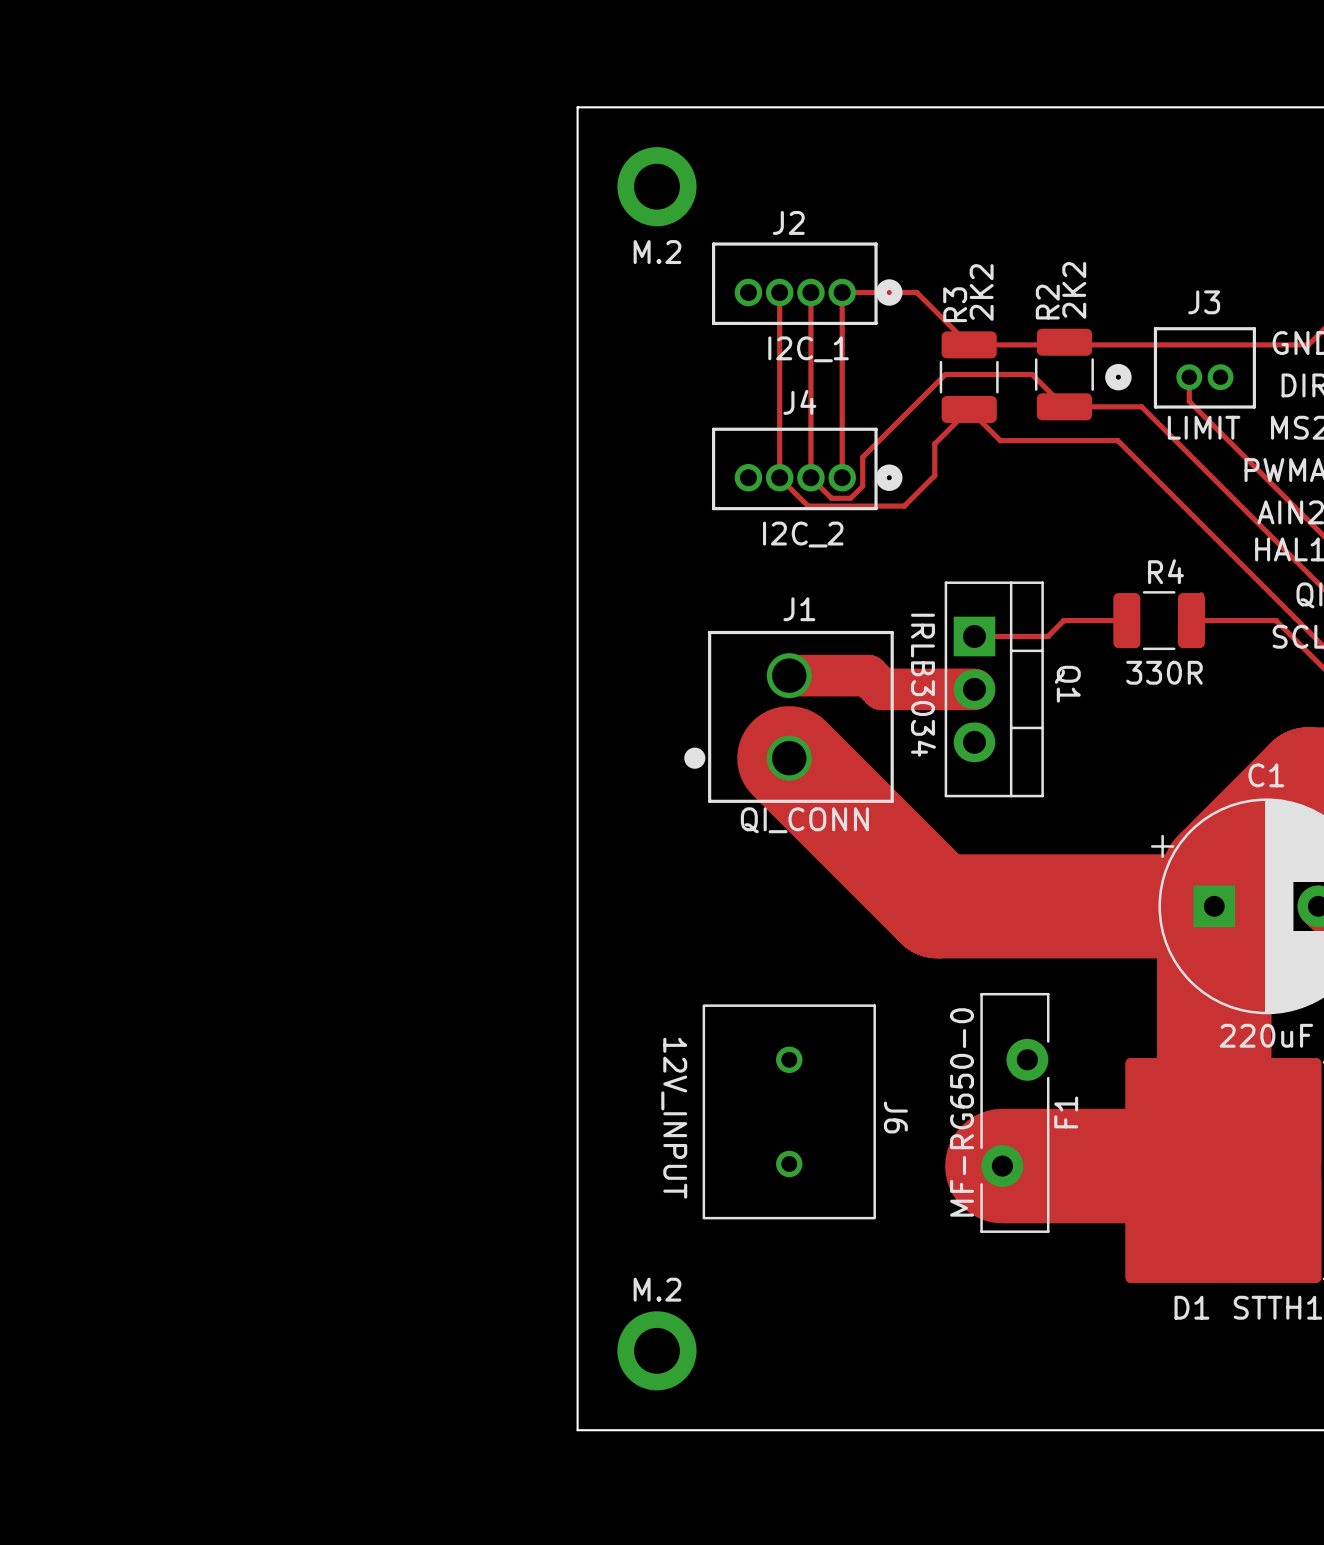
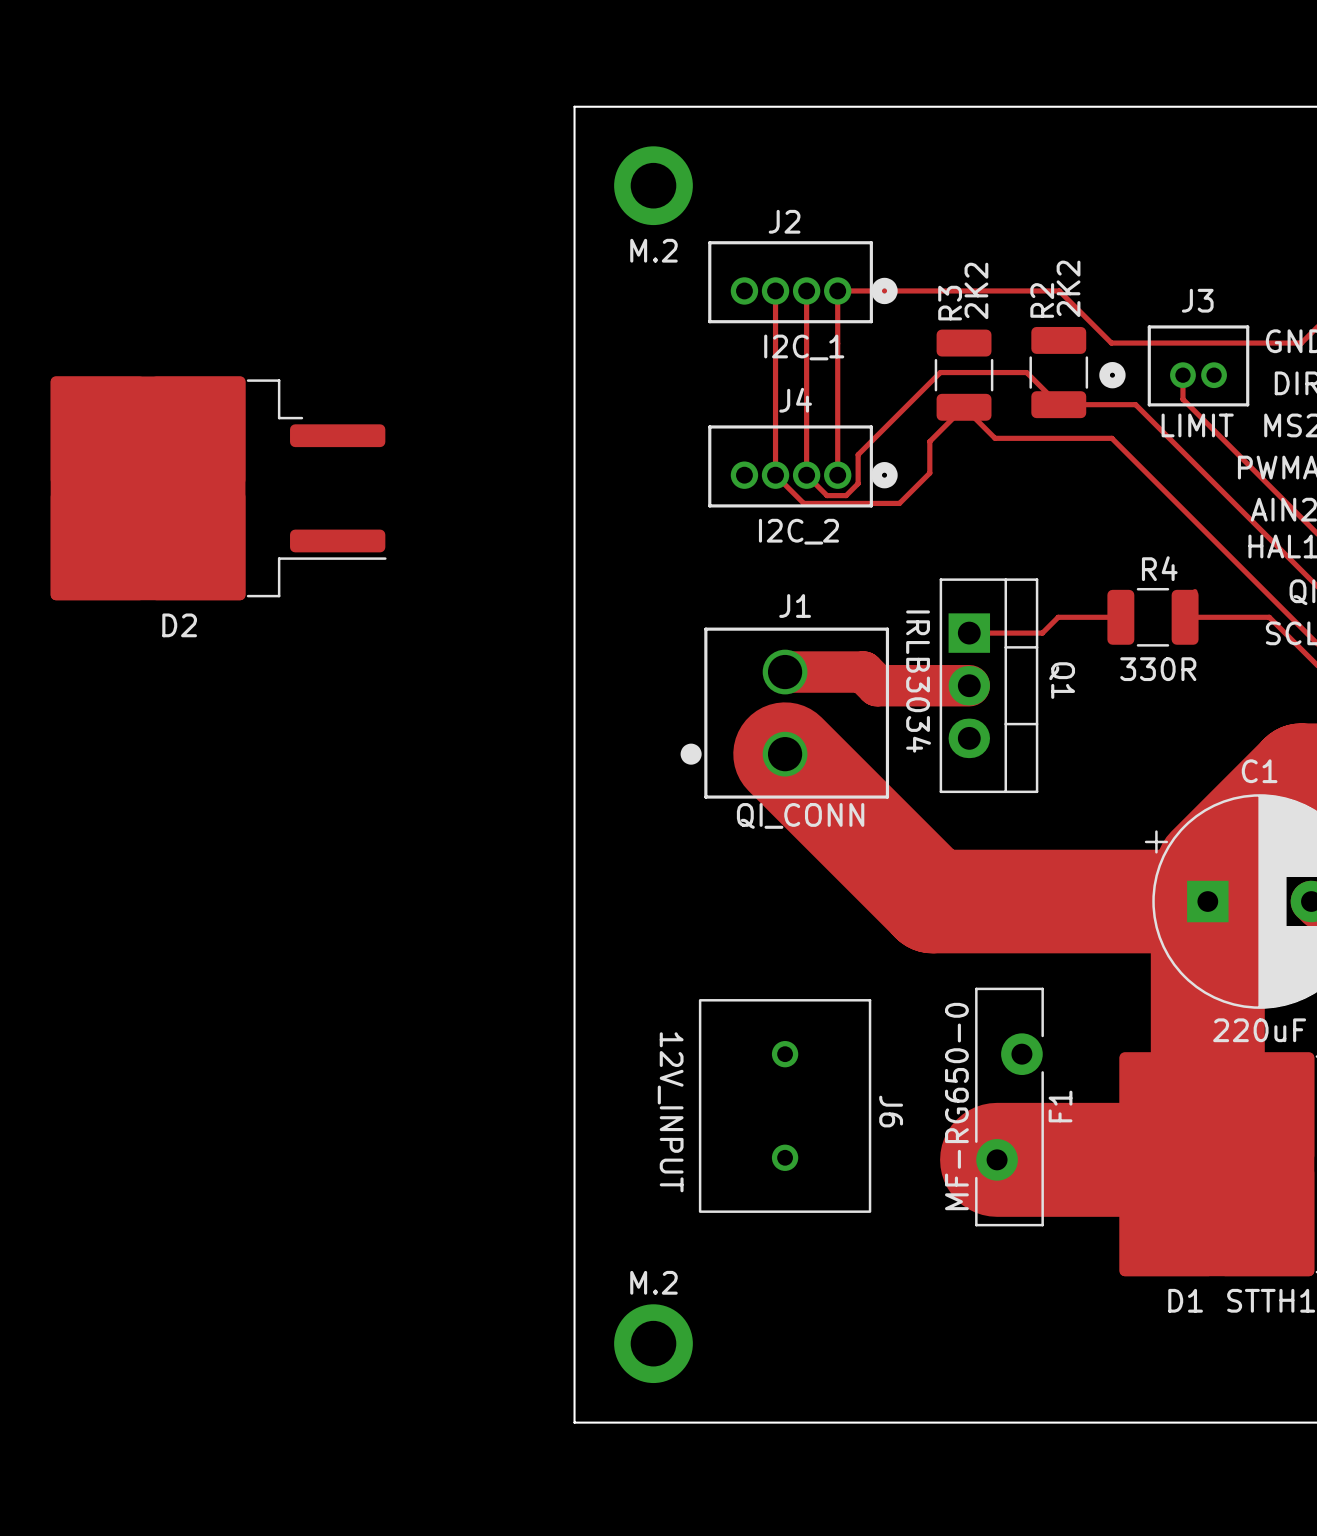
track: (916, 292) (969, 344) (1117, 344) -> (911, 290) (1059, 290) (1111, 343)
D2: none -> (218, 488)

